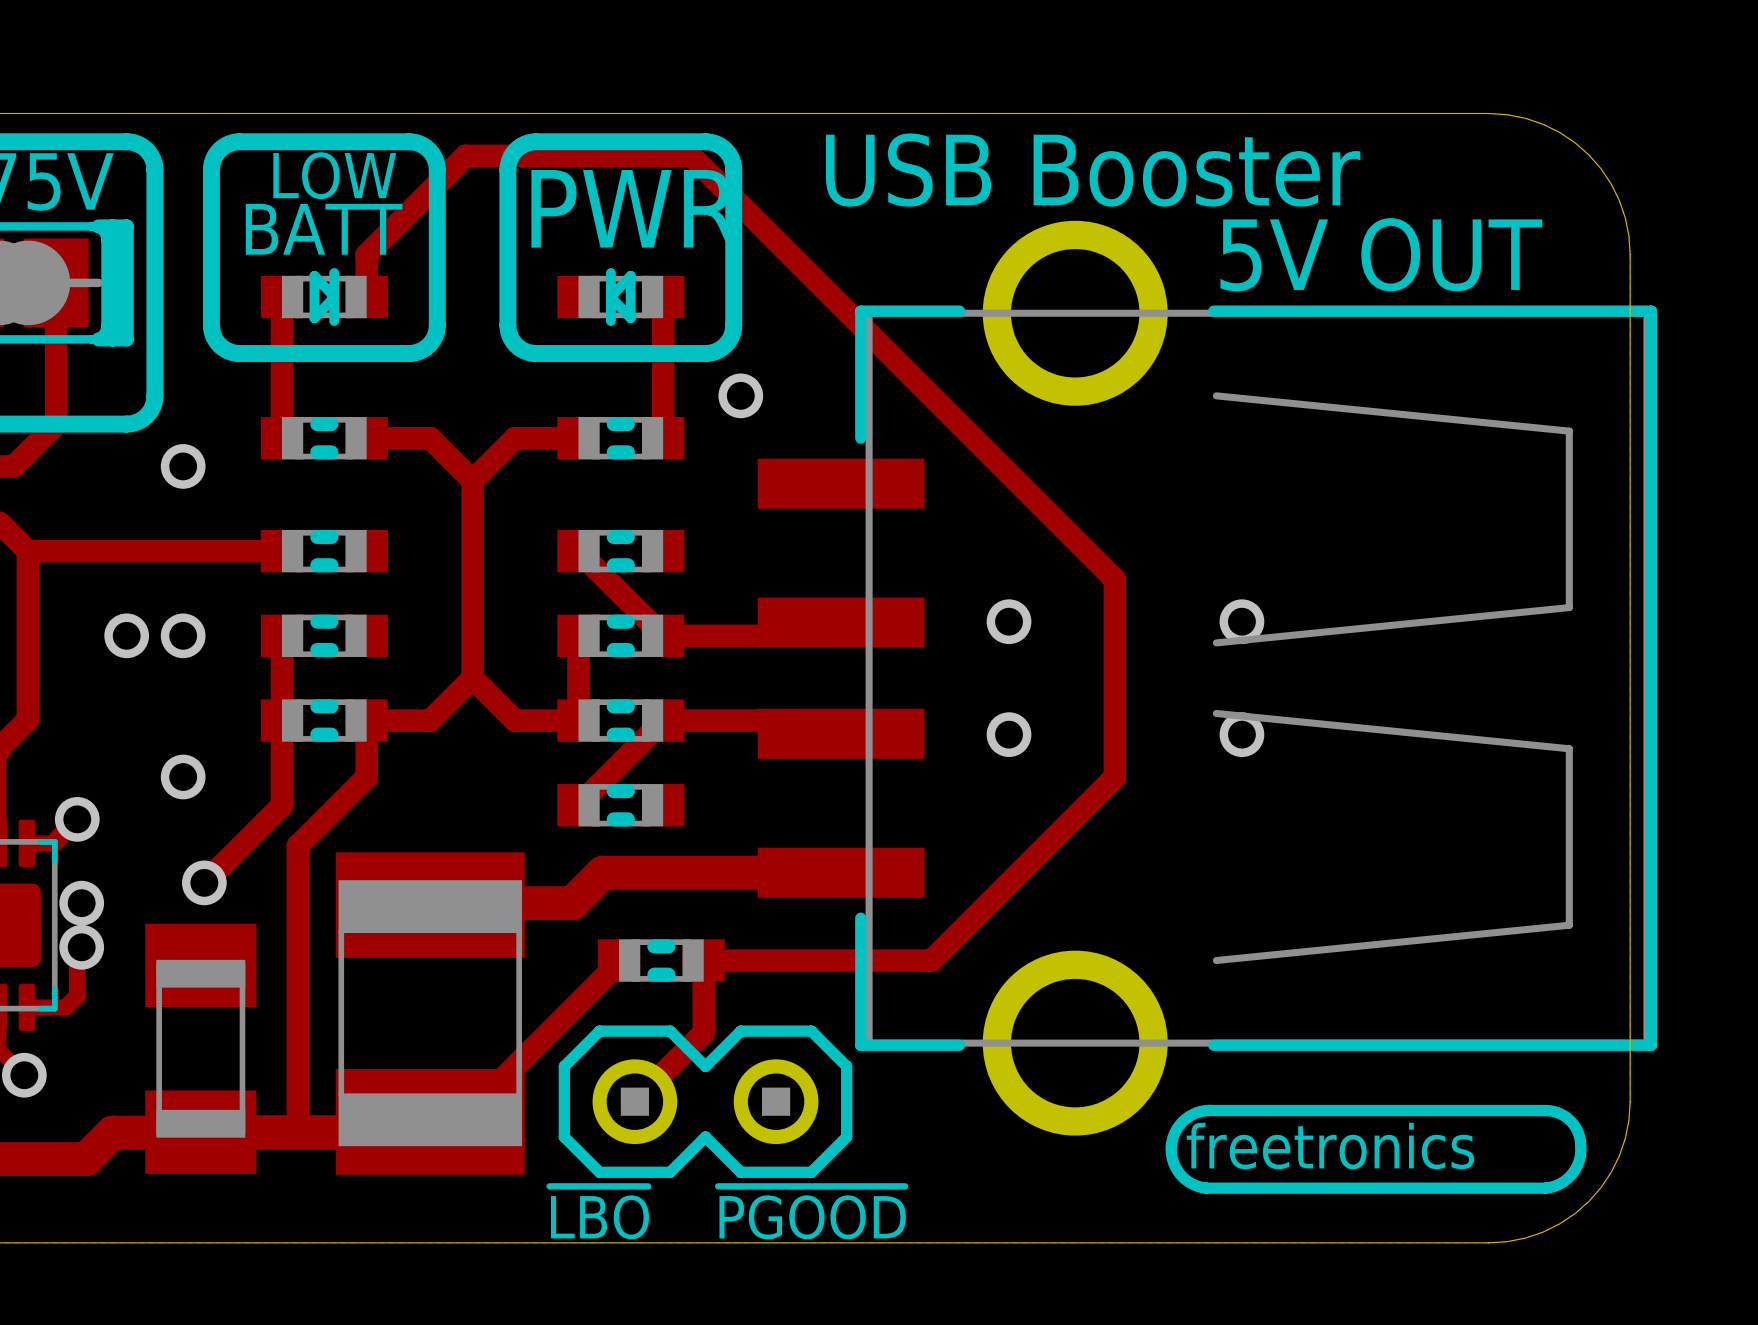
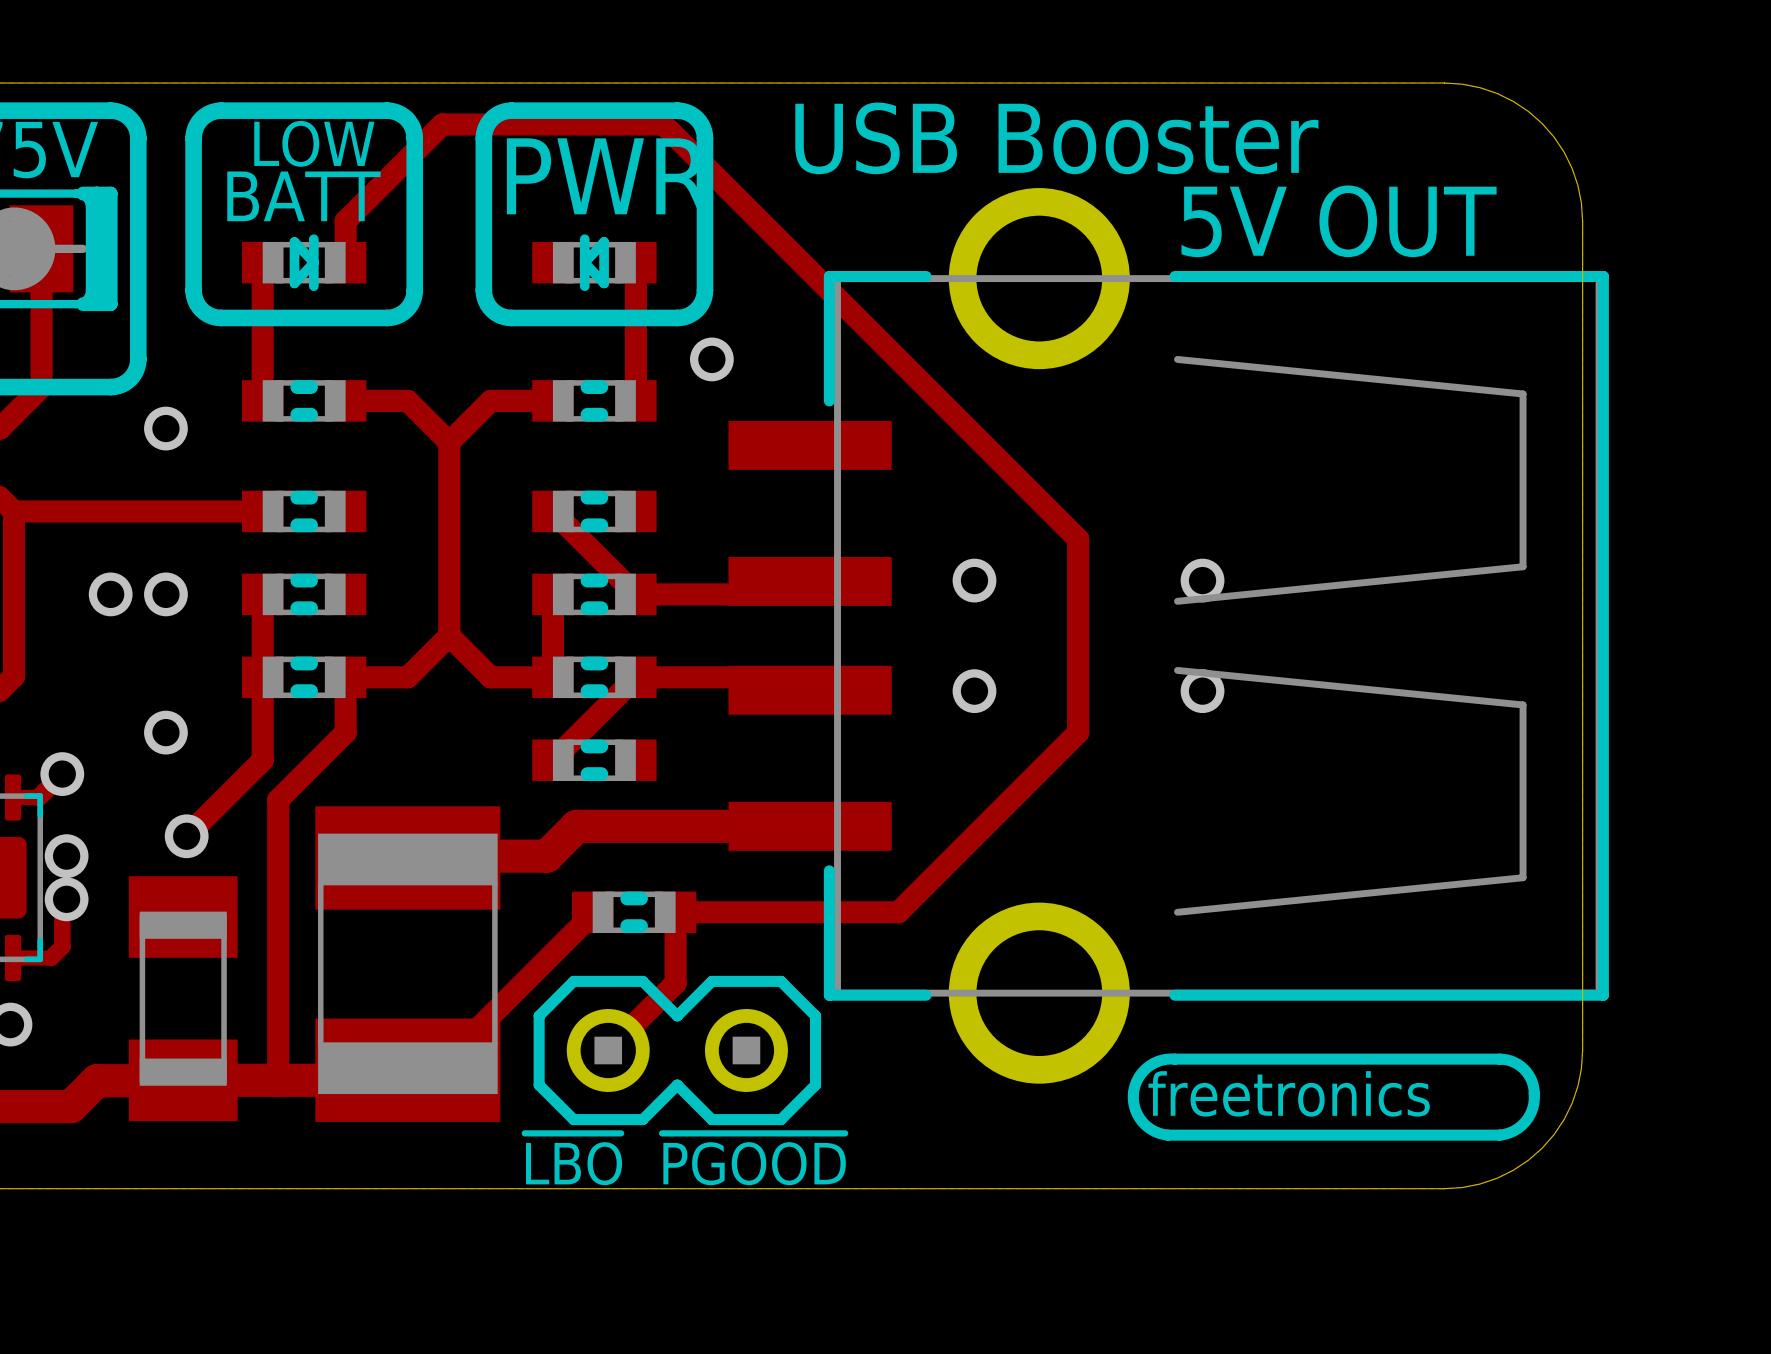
text position: ~{PGOOD} (811, 1212) -> ~{PGOOD} (753, 1159)

